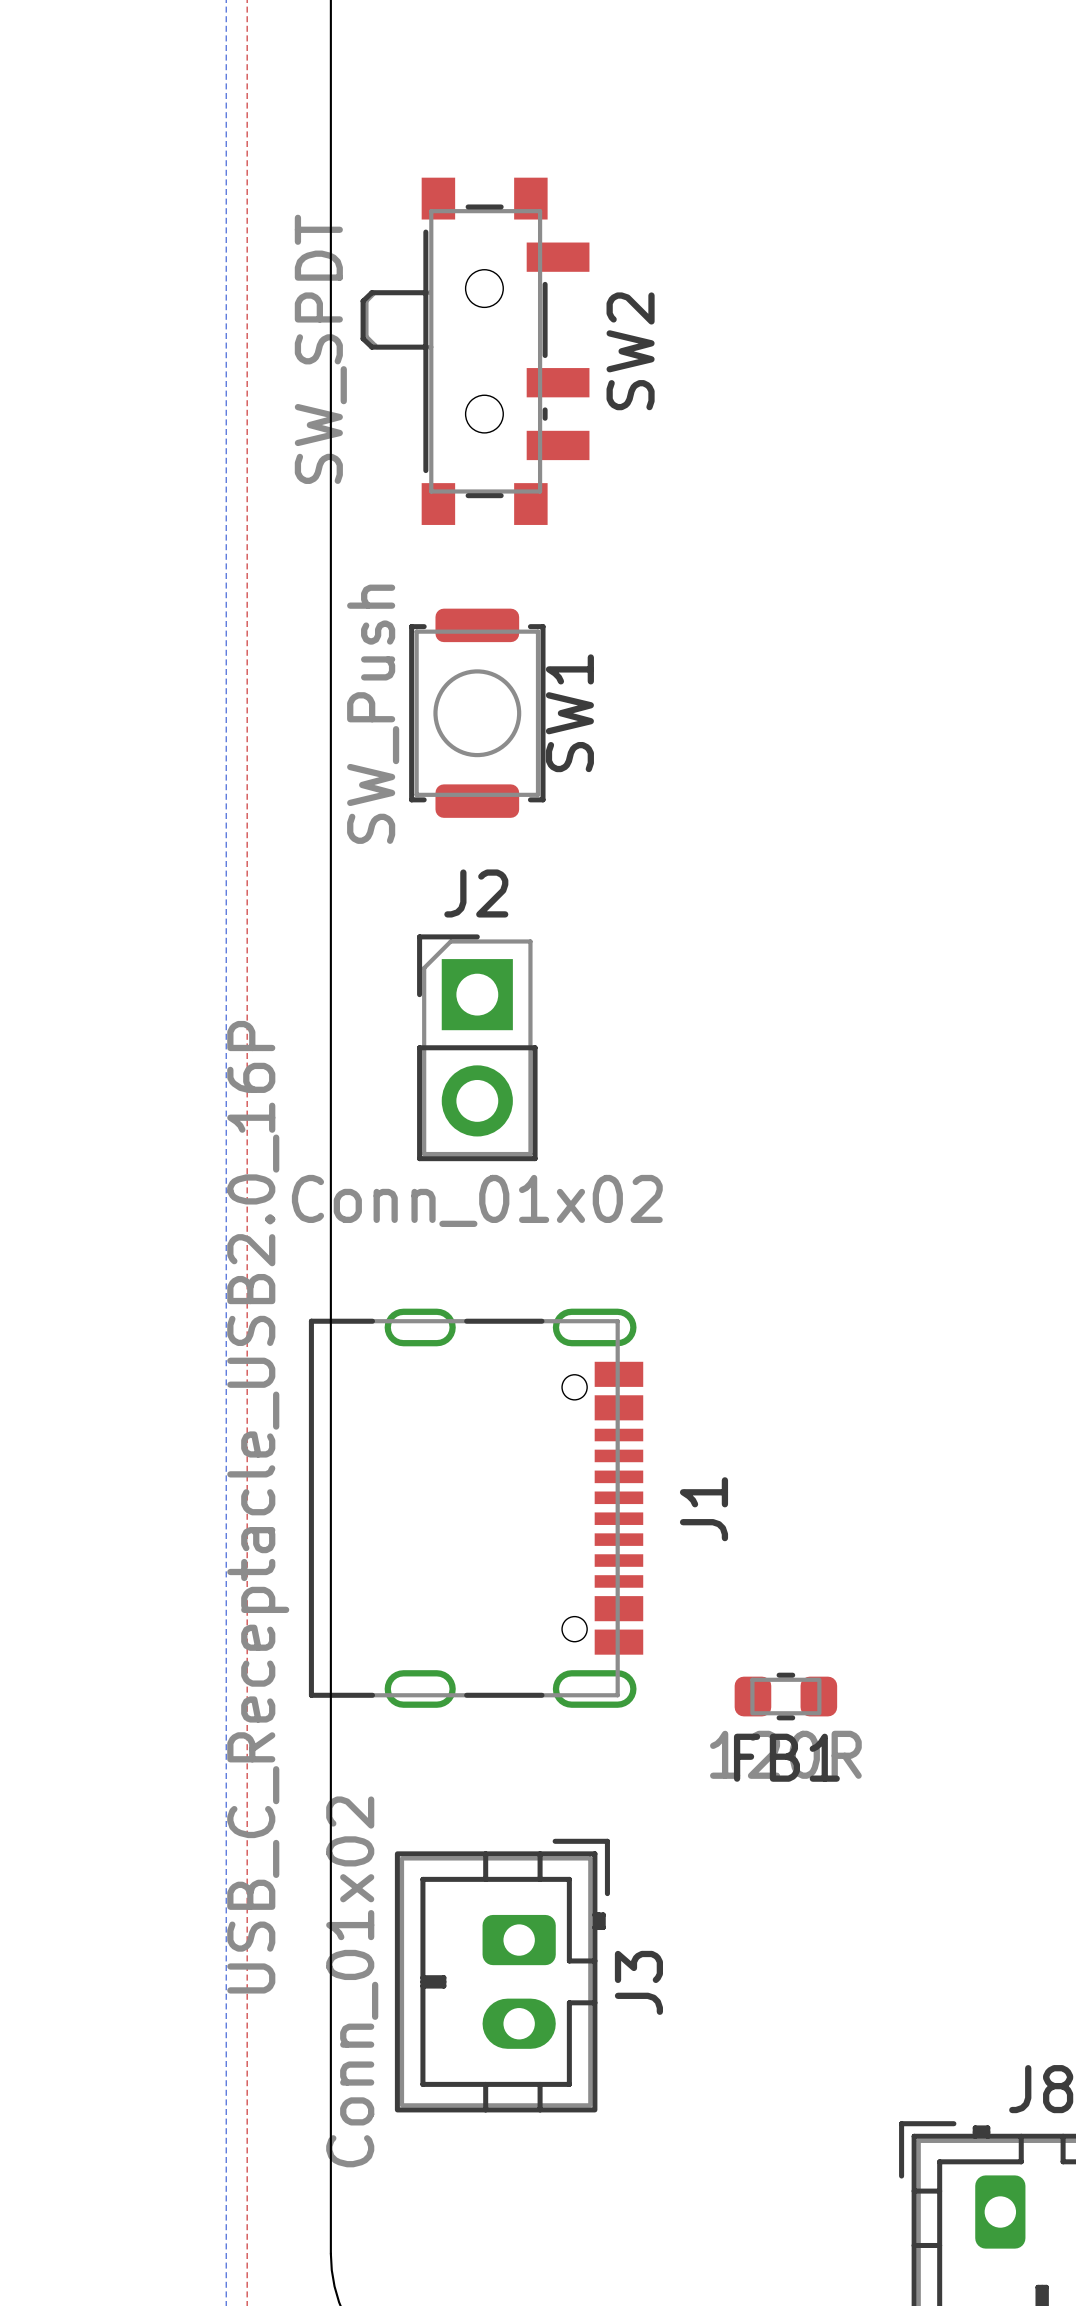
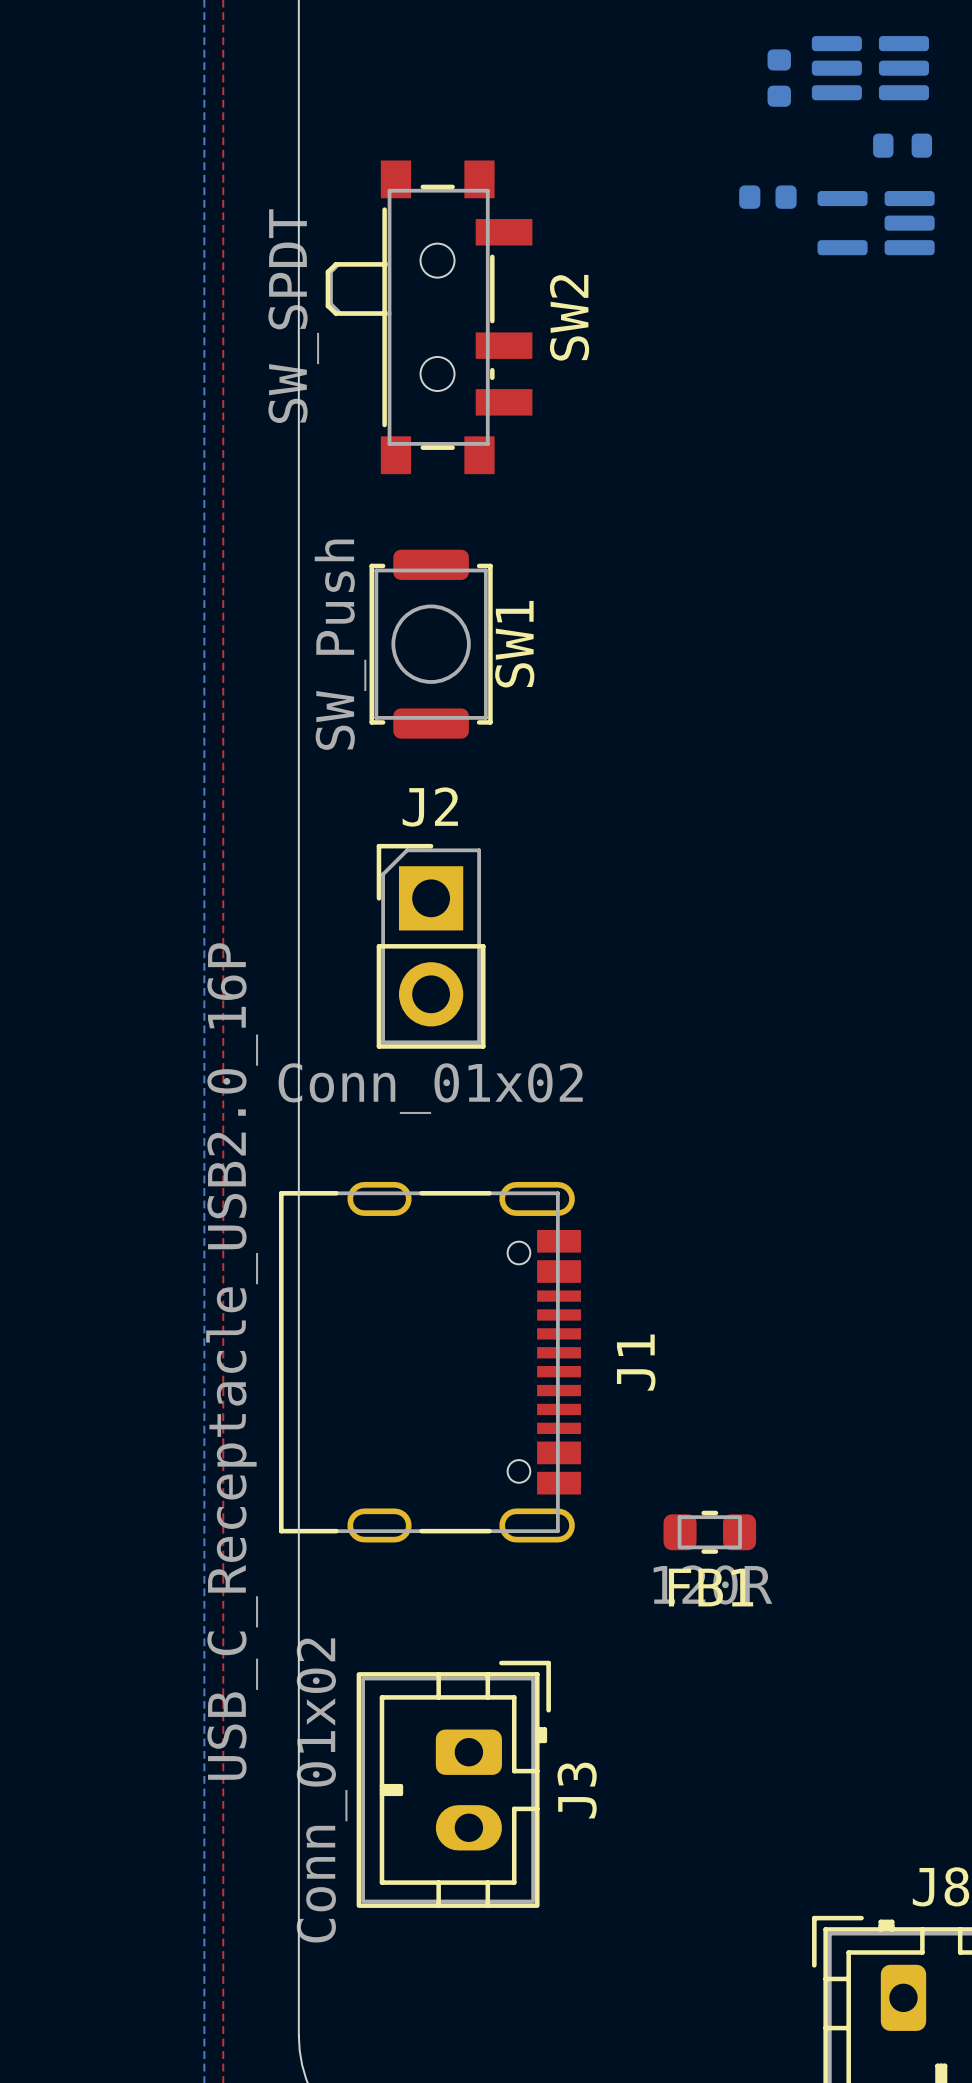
part: none -> (870, 68)
part: none -> (779, 78)
part: none -> (902, 145)
part: none -> (767, 197)
part: none -> (876, 223)

